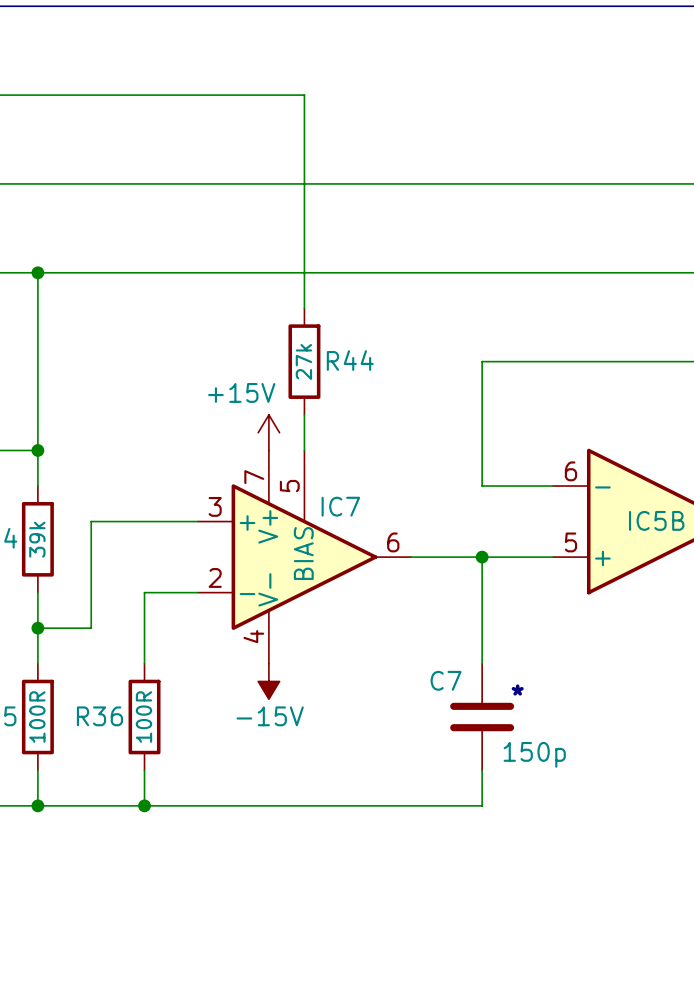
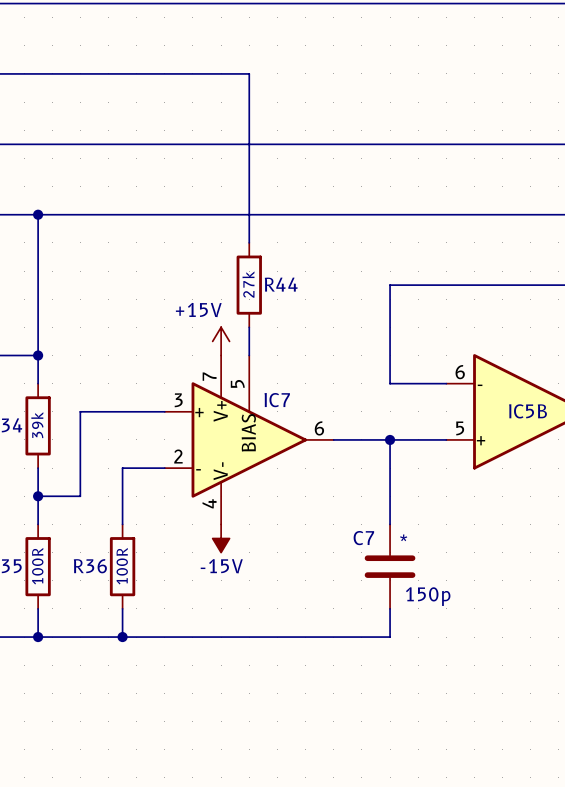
C7 text: none -> * (403, 537)
text: * (517, 690) -> none

